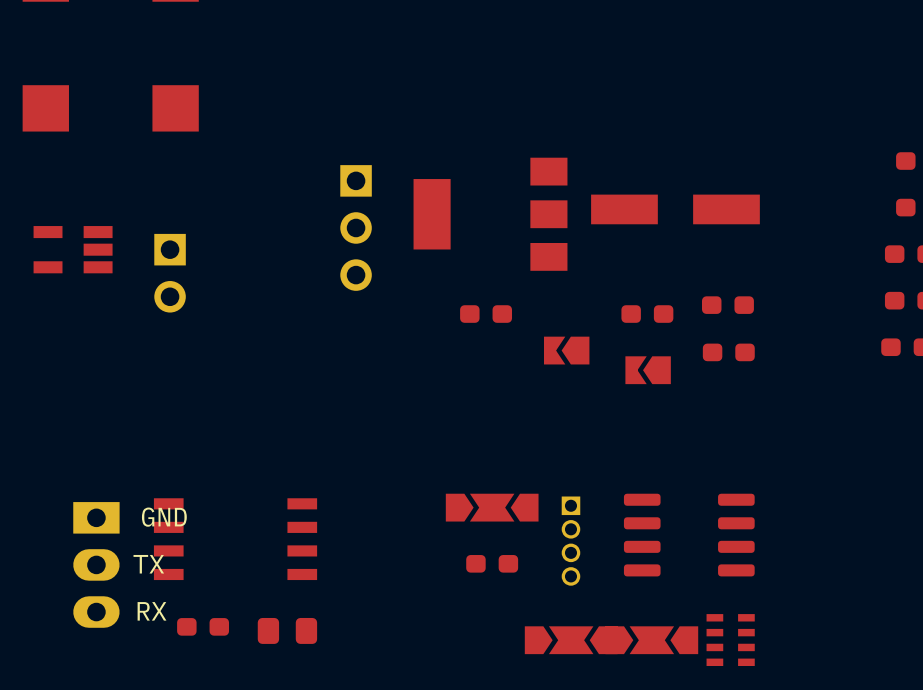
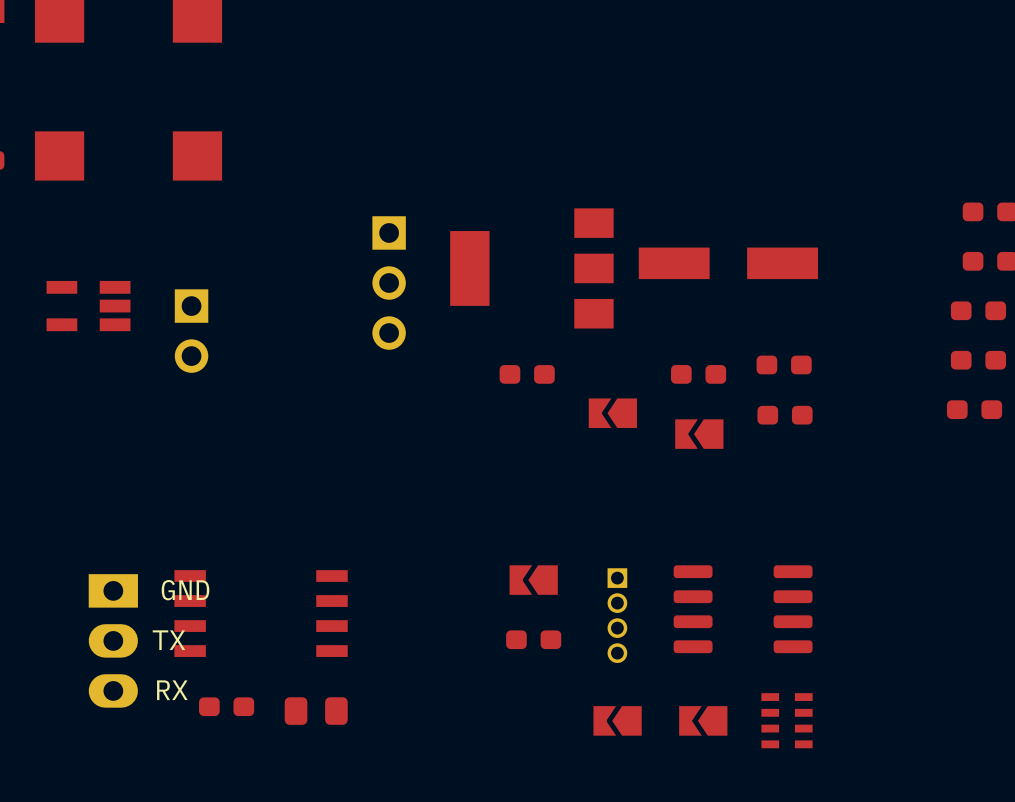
part footprint: [445, 493, 539, 522] -> [509, 565, 558, 595]
part footprint: [524, 626, 618, 655] -> [593, 706, 642, 736]
part footprint: [605, 626, 699, 655] -> [679, 706, 728, 736]

